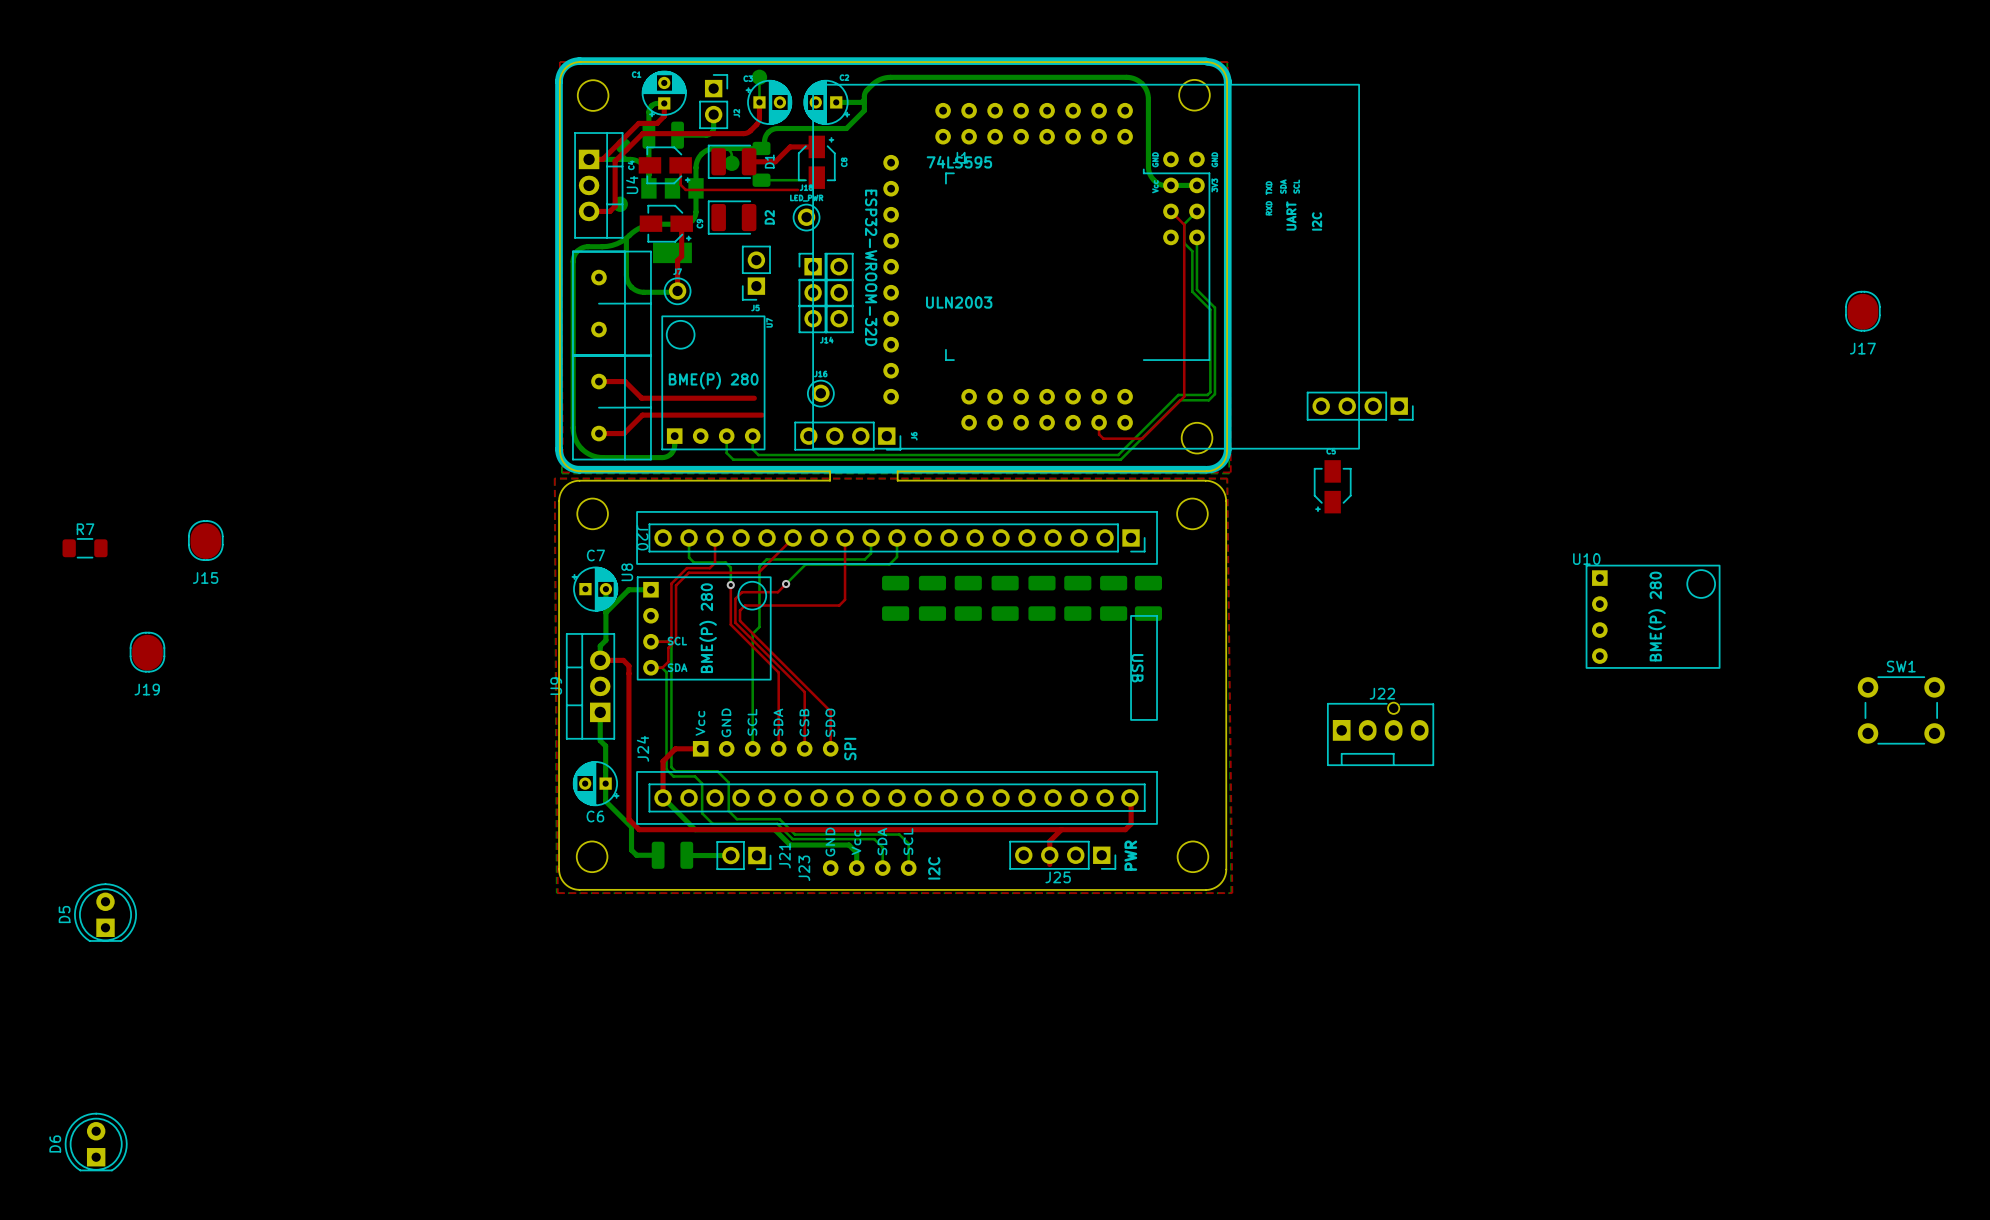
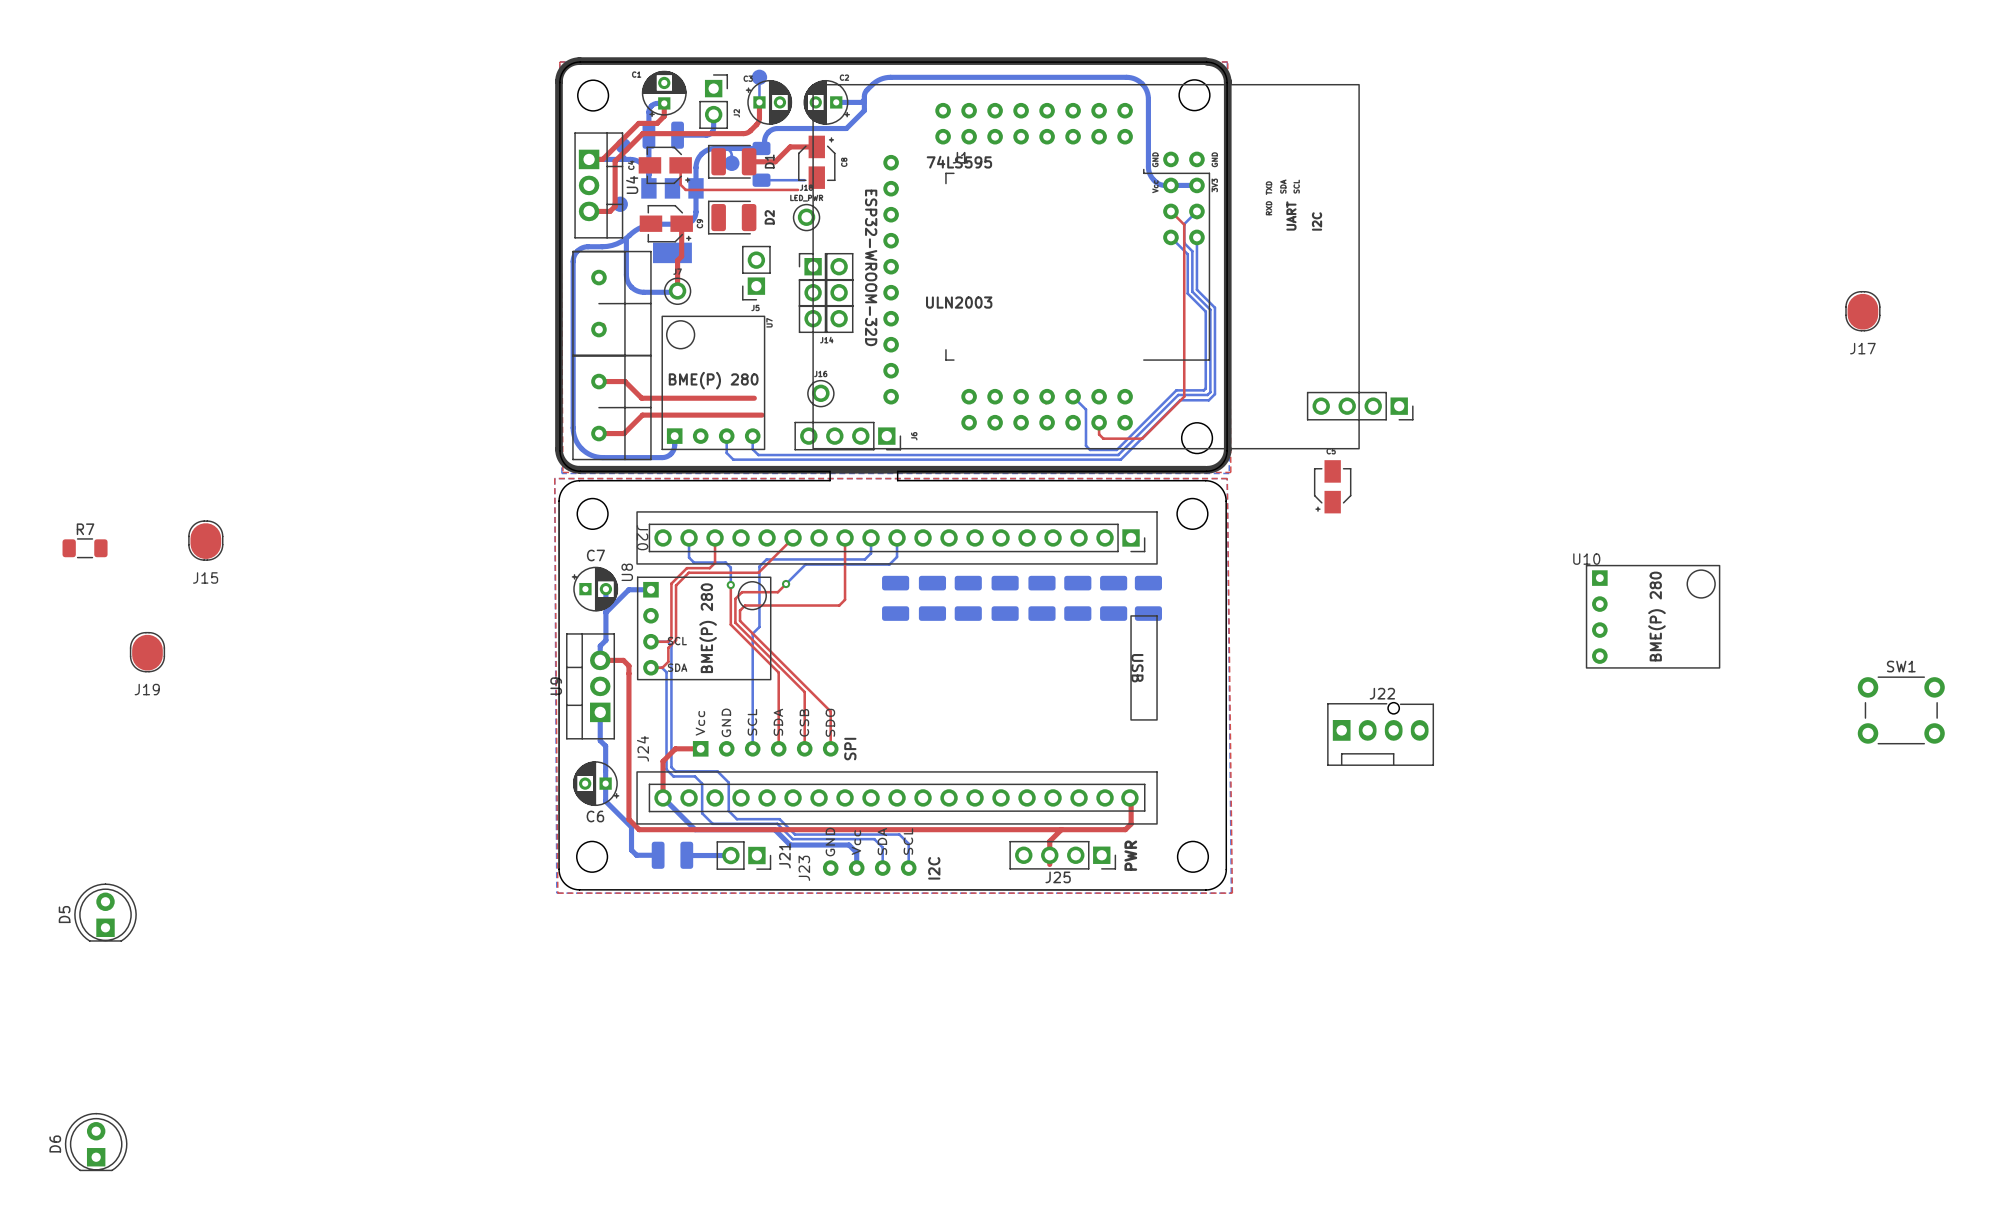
bottom track: none -> (1170, 237) (1187, 254) (1187, 293) (1205, 311) (1205, 388) (1203, 390) (1176, 390) (1116, 449) (1090, 449) (1085, 445) (1085, 409) (1073, 396)

